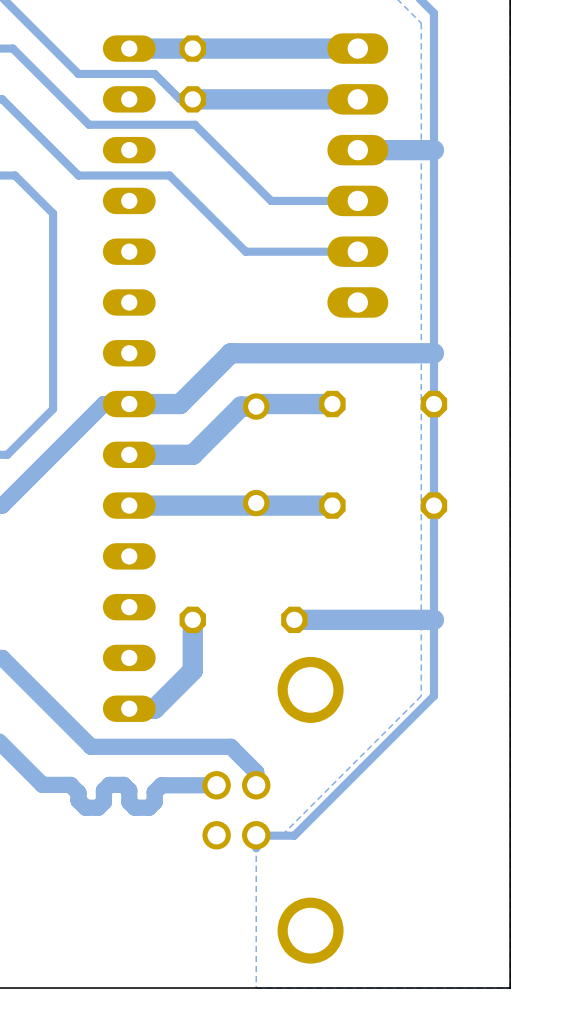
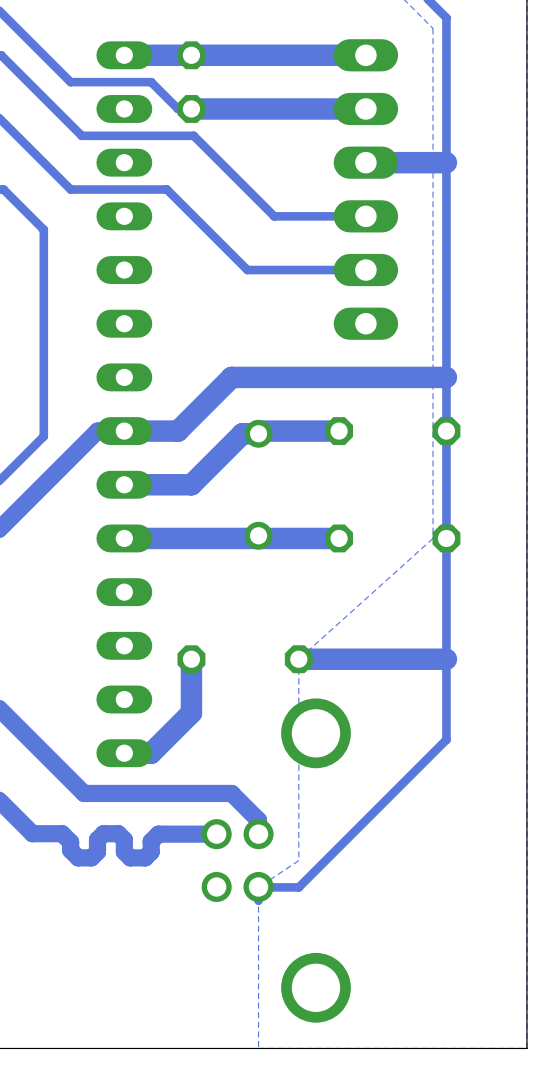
bottom zone outline: (421, 505) (421, 696) (281, 835) (256, 835) -> (433, 538) (298, 659) (298, 860) (258, 887)

